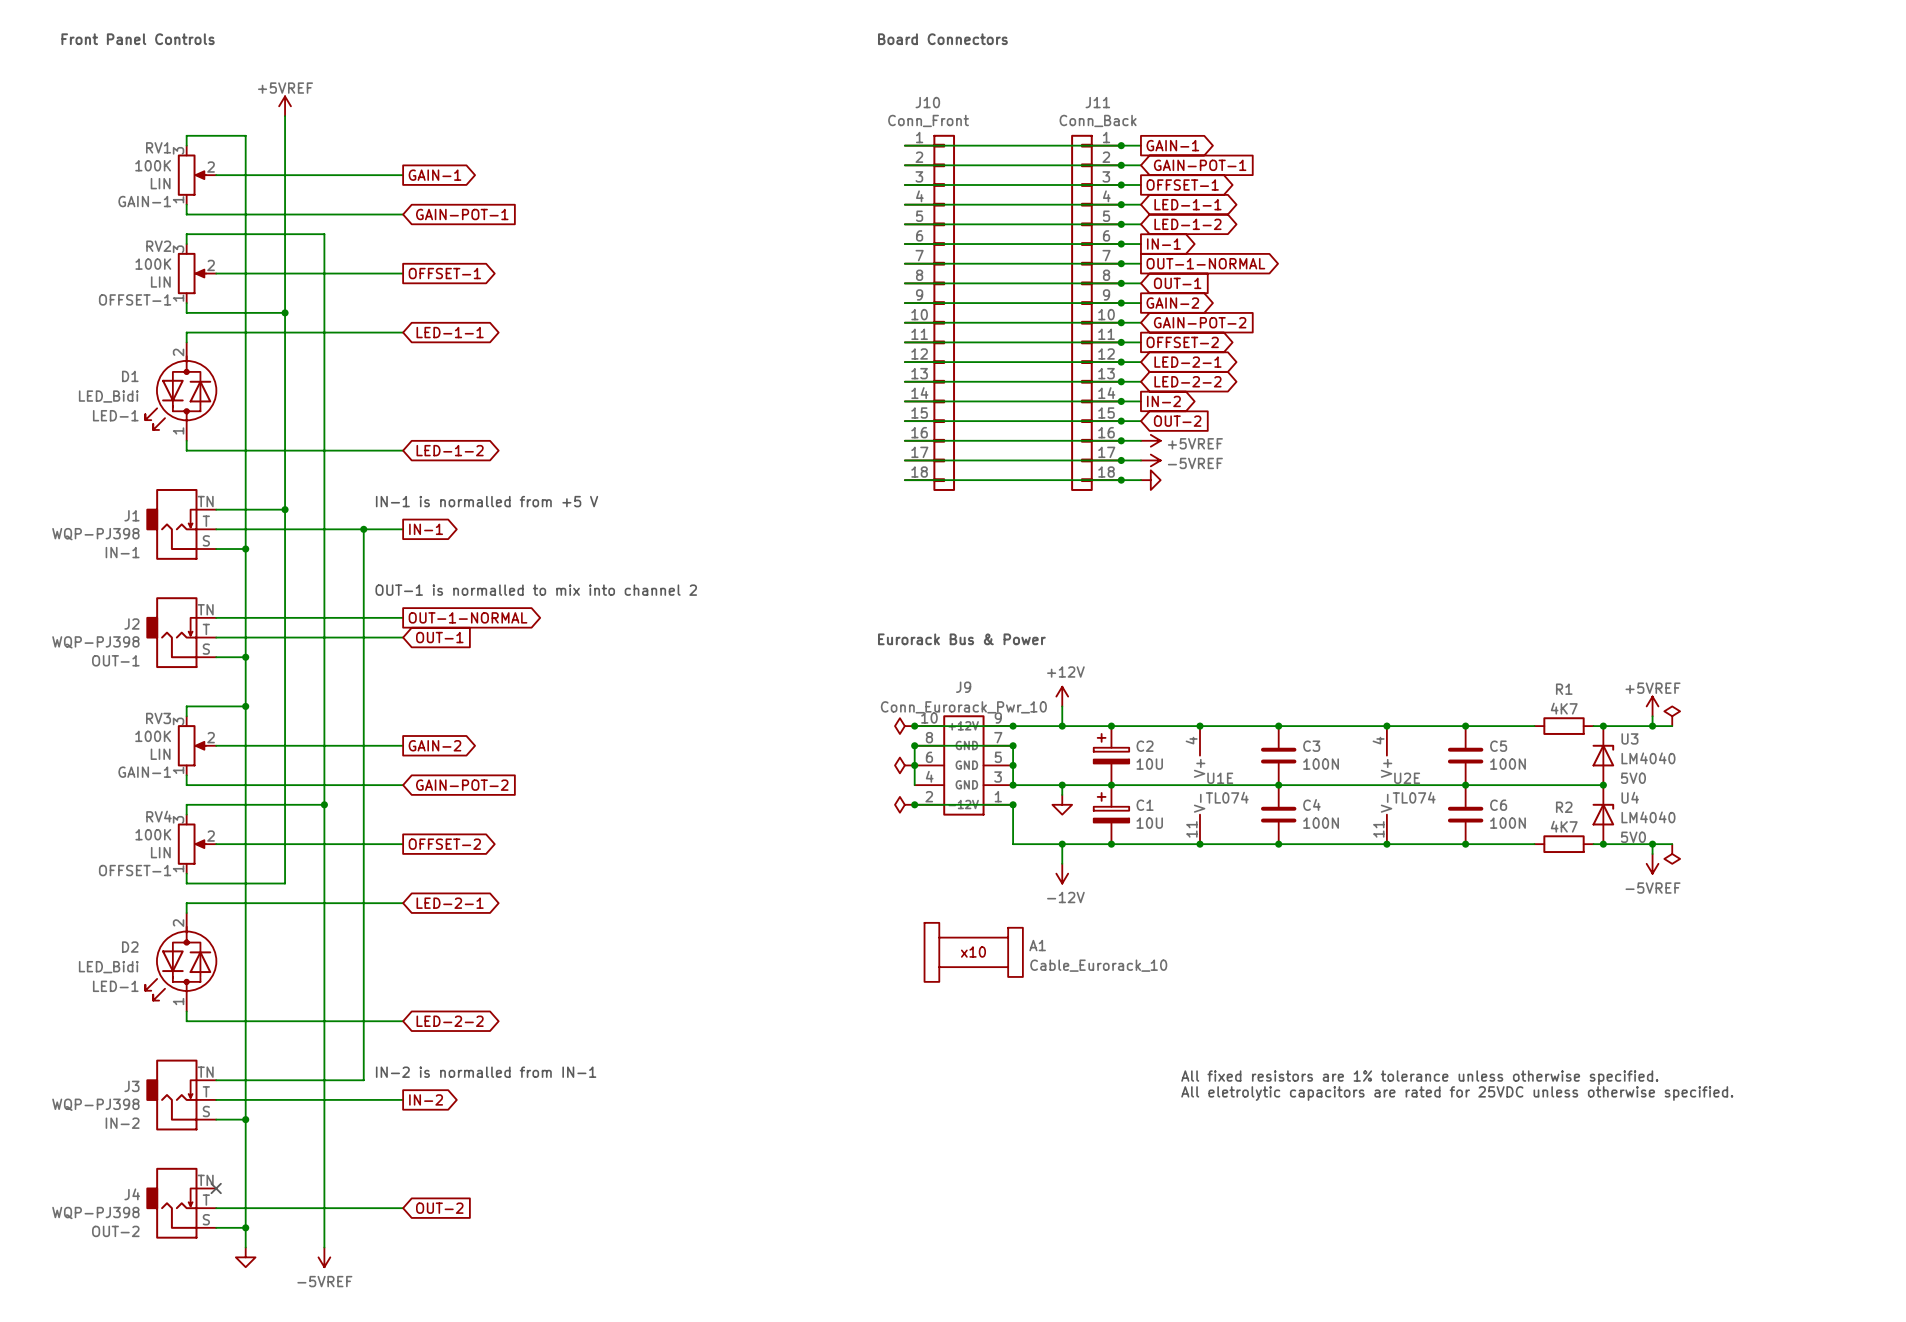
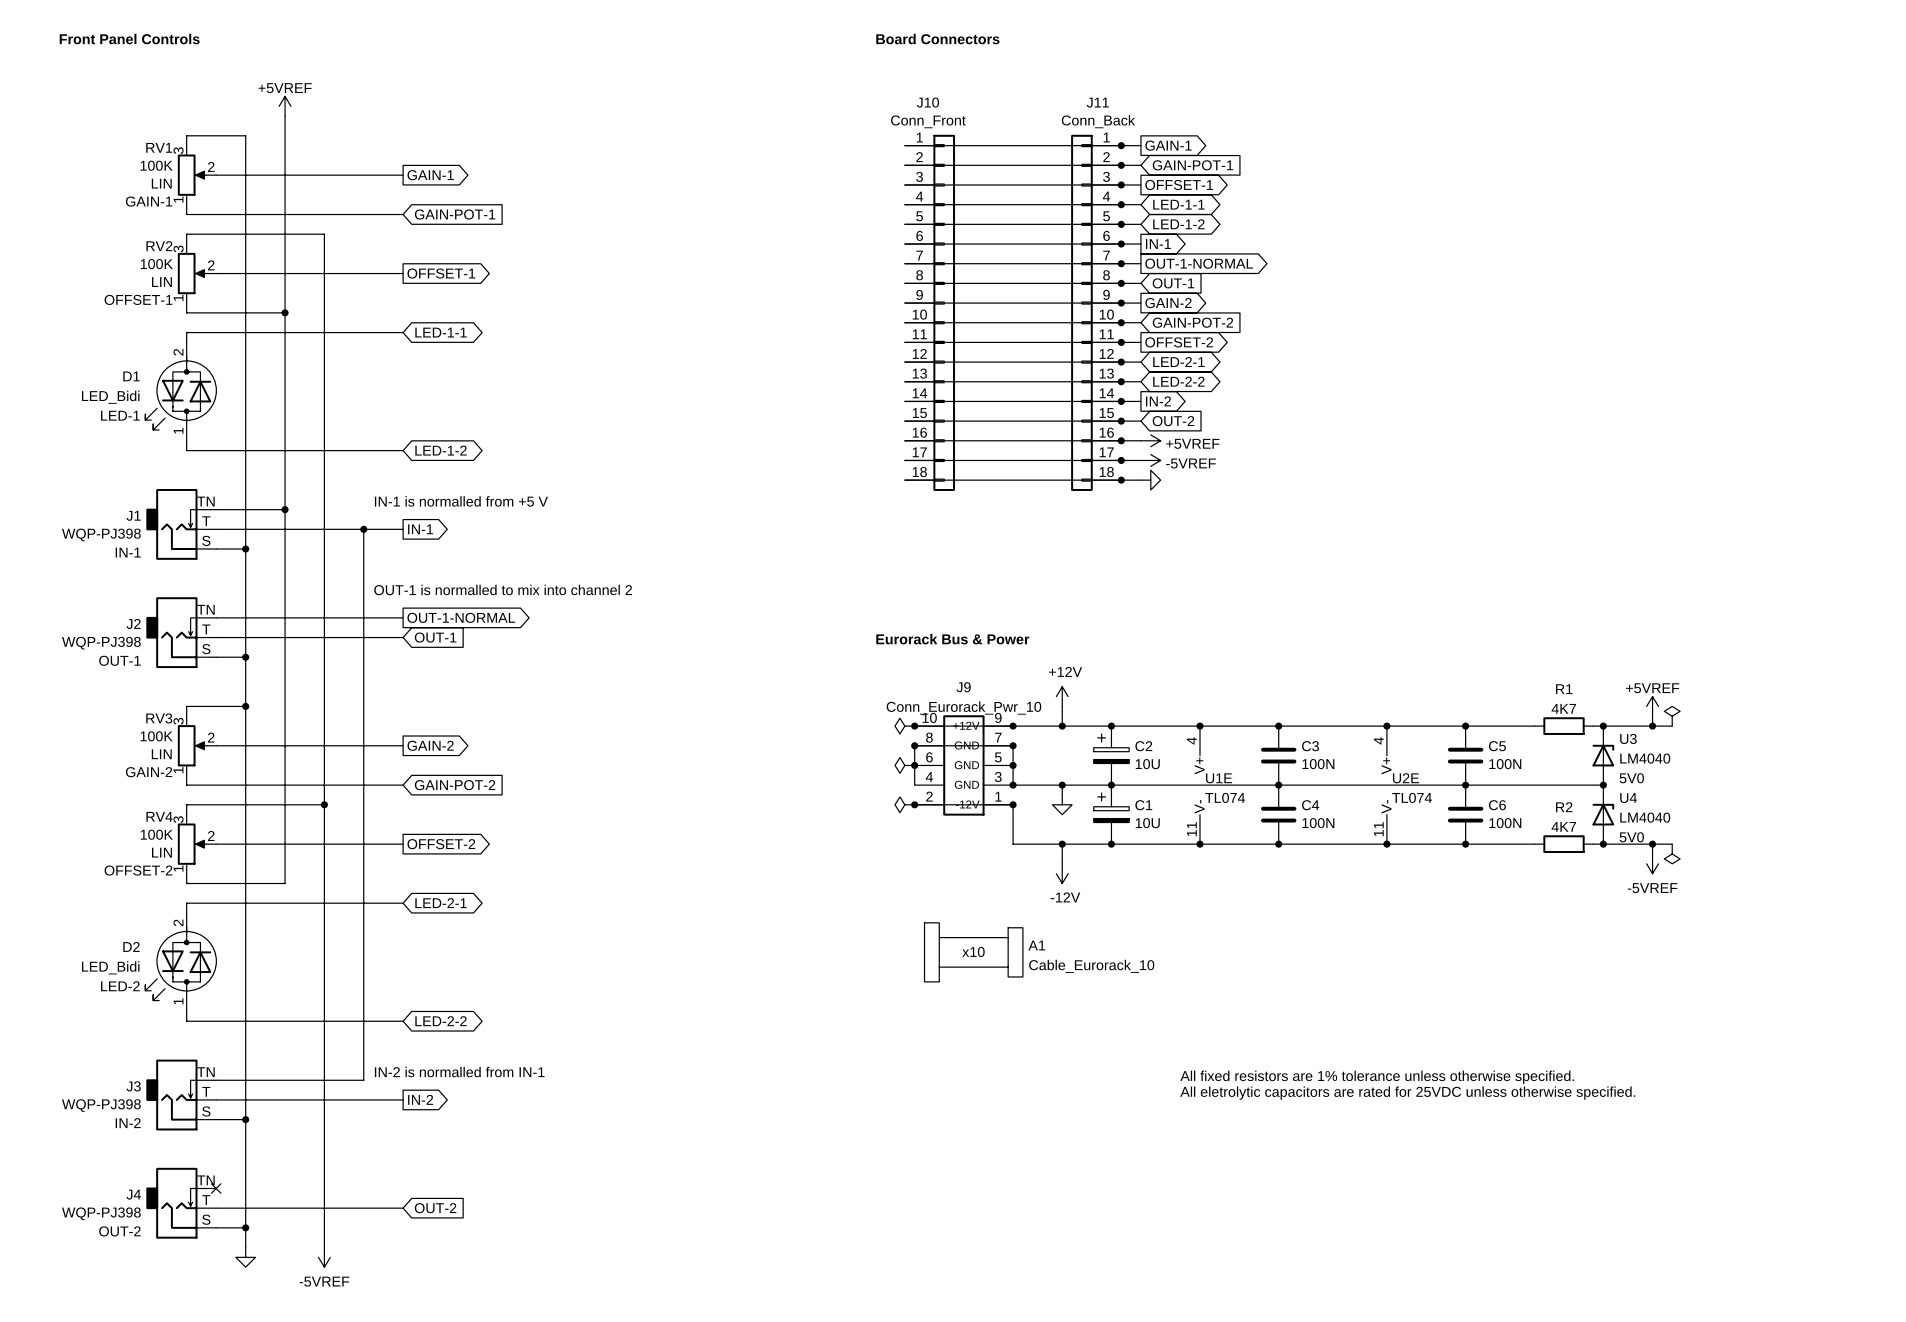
RV3 text: GAIN-1 (144, 772) -> GAIN-2 (149, 772)
RV4 text: OFFSET-1 (135, 870) -> OFFSET-2 (138, 870)
D2 text: LED-1 (115, 986) -> LED-2 (120, 986)

